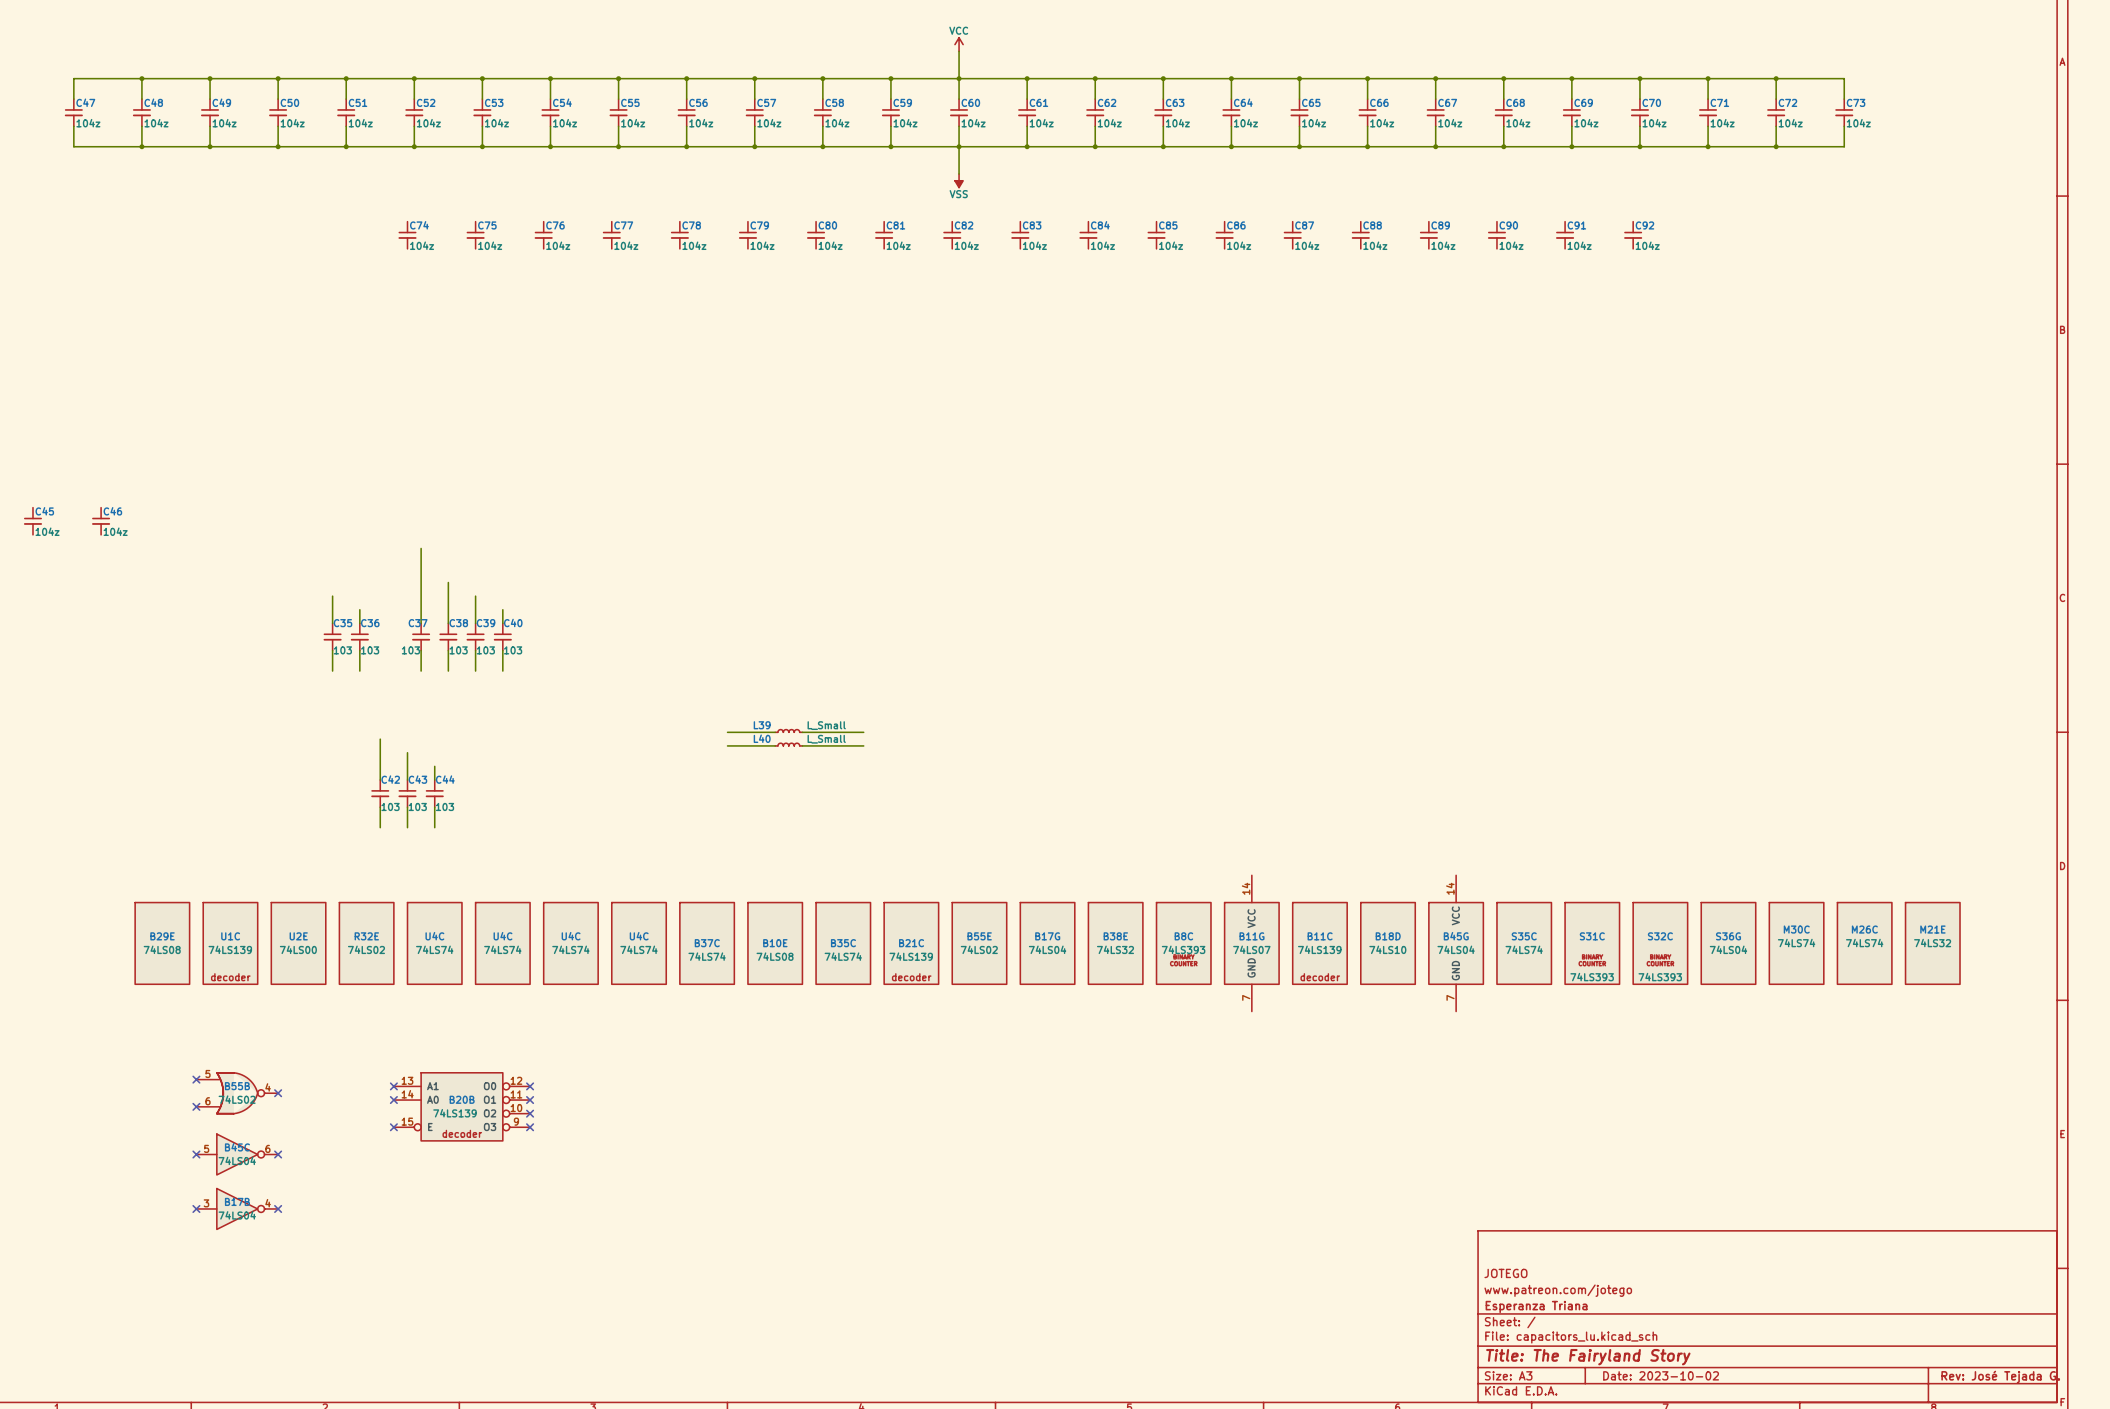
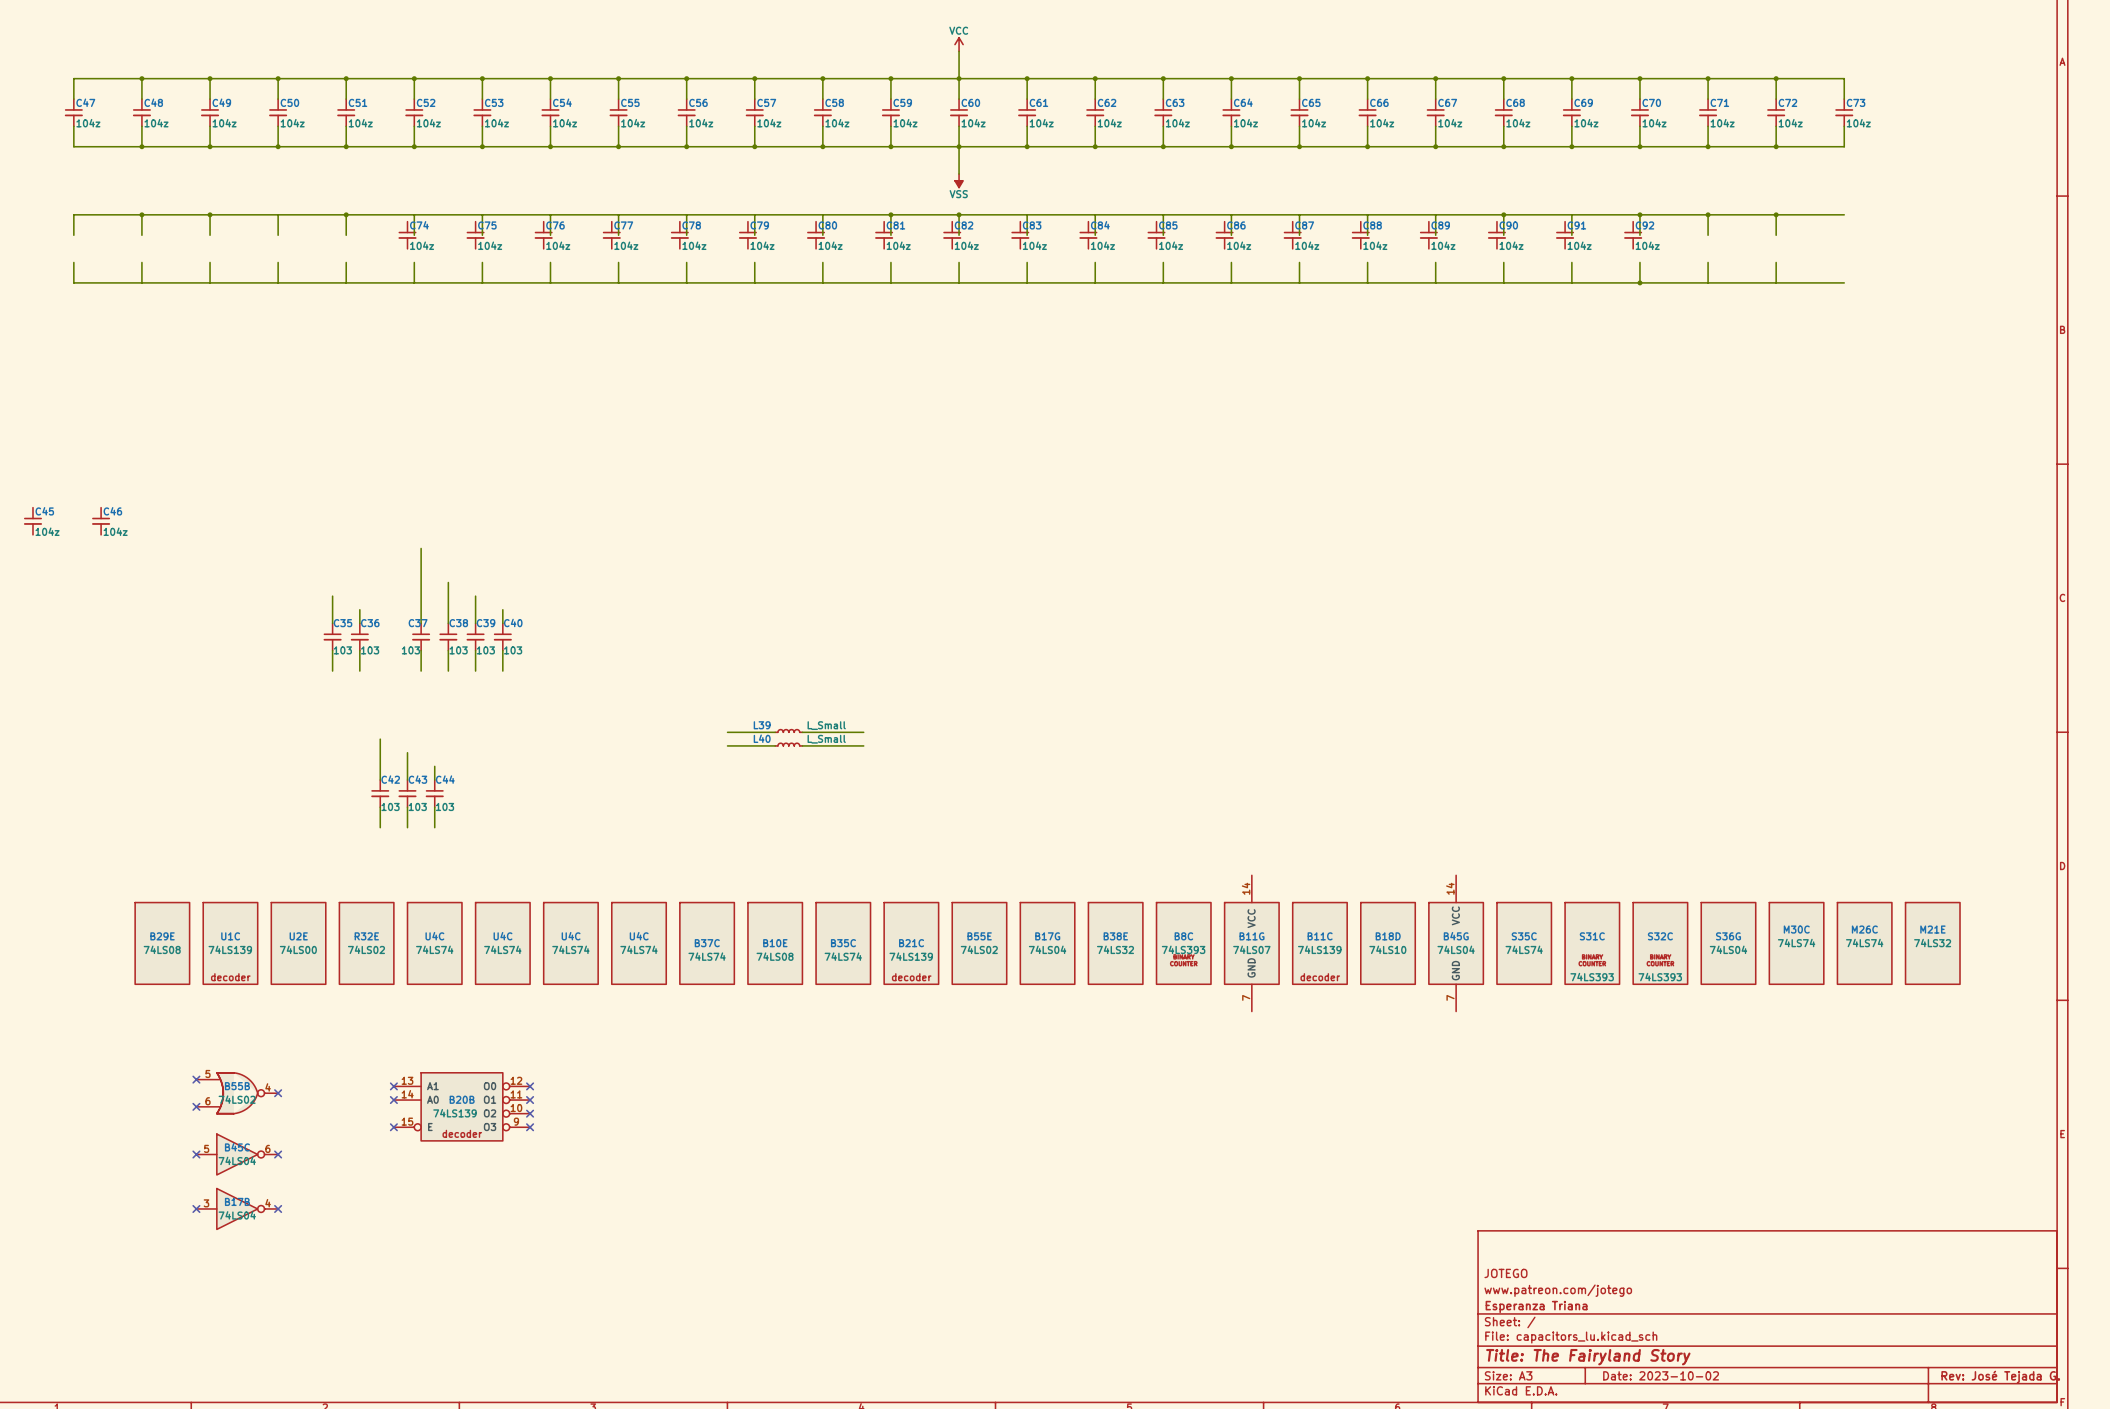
wire: none -> (141, 214) (141, 235)
junction: none -> (141, 214)
wire: none -> (210, 214) (210, 235)
junction: none -> (210, 214)
wire: none -> (278, 214) (278, 235)
wire: none -> (346, 214) (346, 235)
junction: none -> (346, 214)
wire: none -> (414, 214) (414, 235)
wire: none -> (482, 214) (482, 235)
wire: none -> (550, 214) (550, 235)
wire: none -> (618, 214) (618, 235)
wire: none -> (686, 214) (686, 235)
wire: none -> (754, 214) (754, 235)
wire: none -> (822, 214) (822, 235)
wire: none -> (890, 214) (890, 235)
junction: none -> (890, 214)
wire: none -> (959, 214) (959, 235)
junction: none -> (959, 214)
wire: none -> (1027, 214) (1027, 235)
wire: none -> (1095, 214) (1095, 235)
wire: none -> (1163, 214) (1163, 235)
wire: none -> (1231, 214) (1231, 235)
wire: none -> (1299, 214) (1299, 235)
wire: none -> (1367, 214) (1367, 235)
wire: none -> (1435, 214) (1435, 235)
wire: none -> (1503, 214) (1503, 235)
junction: none -> (1503, 214)
wire: none -> (1571, 214) (1571, 235)
wire: none -> (1639, 214) (1639, 235)
junction: none -> (1639, 214)
wire: none -> (1708, 214) (1708, 235)
junction: none -> (1708, 214)
wire: none -> (1776, 214) (1776, 235)
junction: none -> (1776, 214)
wire: none -> (1844, 214) (73, 214) (73, 235)
wire: none -> (73, 262) (73, 282) (1844, 282)
wire: none -> (141, 262) (141, 282)
wire: none -> (210, 262) (210, 282)
wire: none -> (278, 262) (278, 282)
wire: none -> (346, 262) (346, 282)
wire: none -> (414, 262) (414, 282)
wire: none -> (482, 262) (482, 282)
wire: none -> (550, 262) (550, 282)
wire: none -> (618, 262) (618, 282)
wire: none -> (686, 262) (686, 282)
wire: none -> (754, 262) (754, 282)
wire: none -> (822, 262) (822, 282)
wire: none -> (890, 262) (890, 282)
wire: none -> (959, 262) (959, 282)
wire: none -> (1027, 262) (1027, 282)
wire: none -> (1095, 262) (1095, 282)
wire: none -> (1163, 262) (1163, 282)
wire: none -> (1231, 262) (1231, 282)
wire: none -> (1299, 262) (1299, 282)
wire: none -> (1367, 262) (1367, 282)
wire: none -> (1435, 262) (1435, 282)
wire: none -> (1503, 262) (1503, 282)
wire: none -> (1571, 262) (1571, 282)
wire: none -> (1639, 262) (1639, 282)
wire: none -> (1708, 262) (1708, 282)
wire: none -> (1776, 262) (1776, 282)
junction: none -> (1639, 282)

